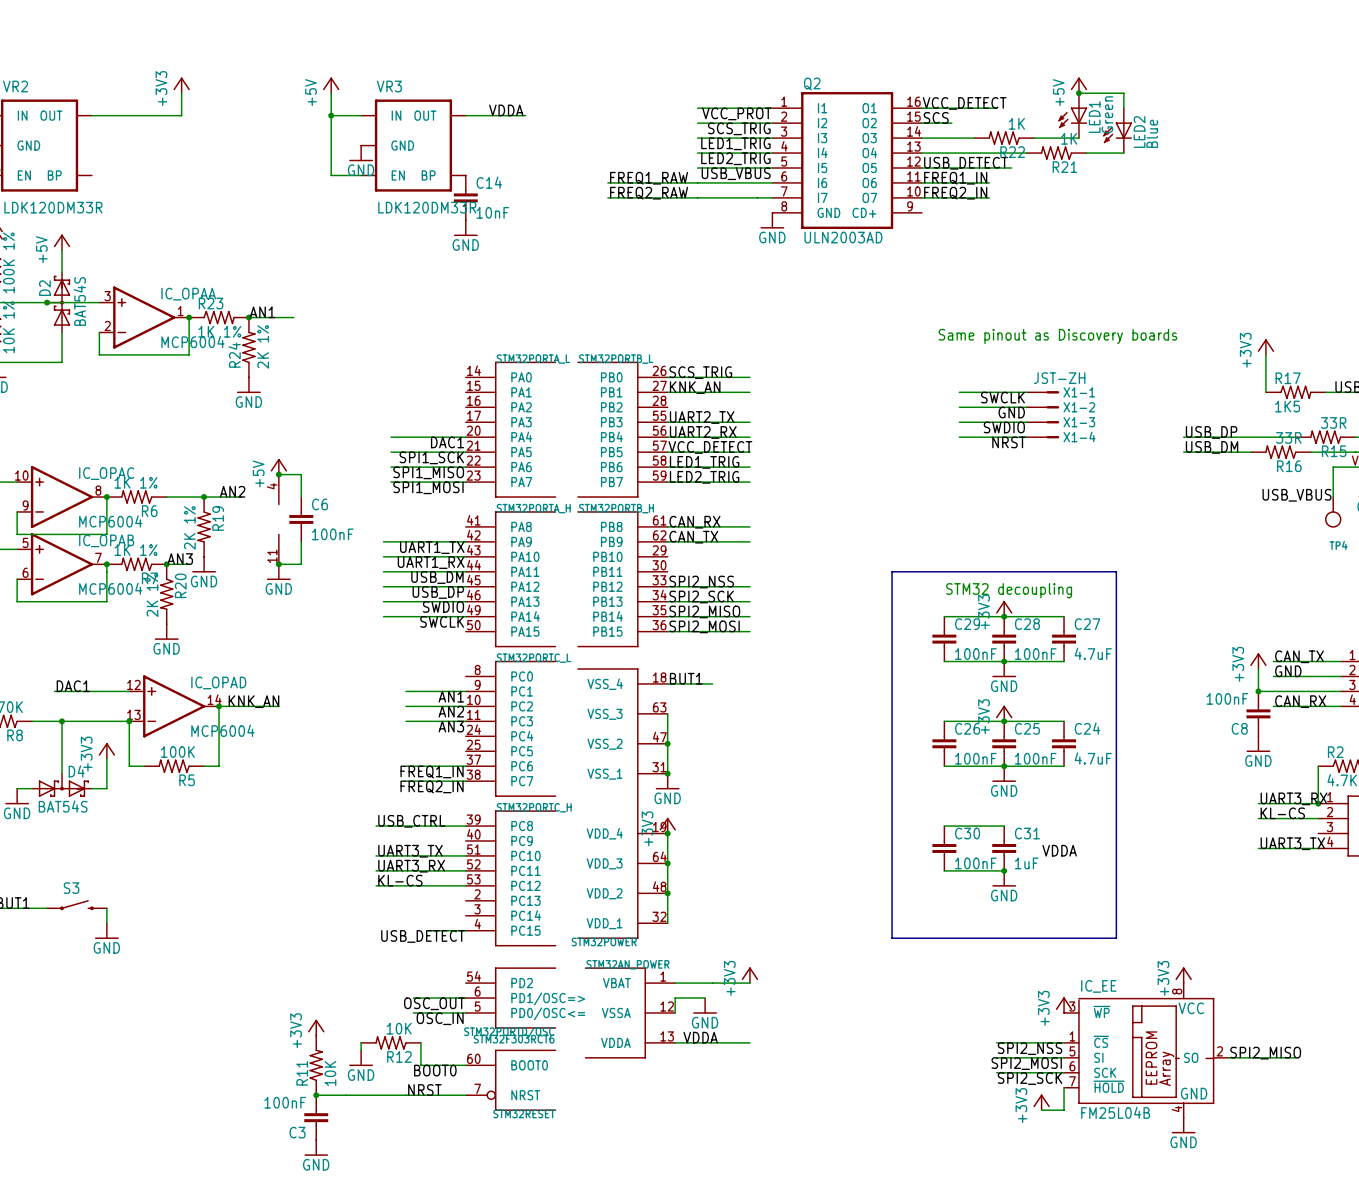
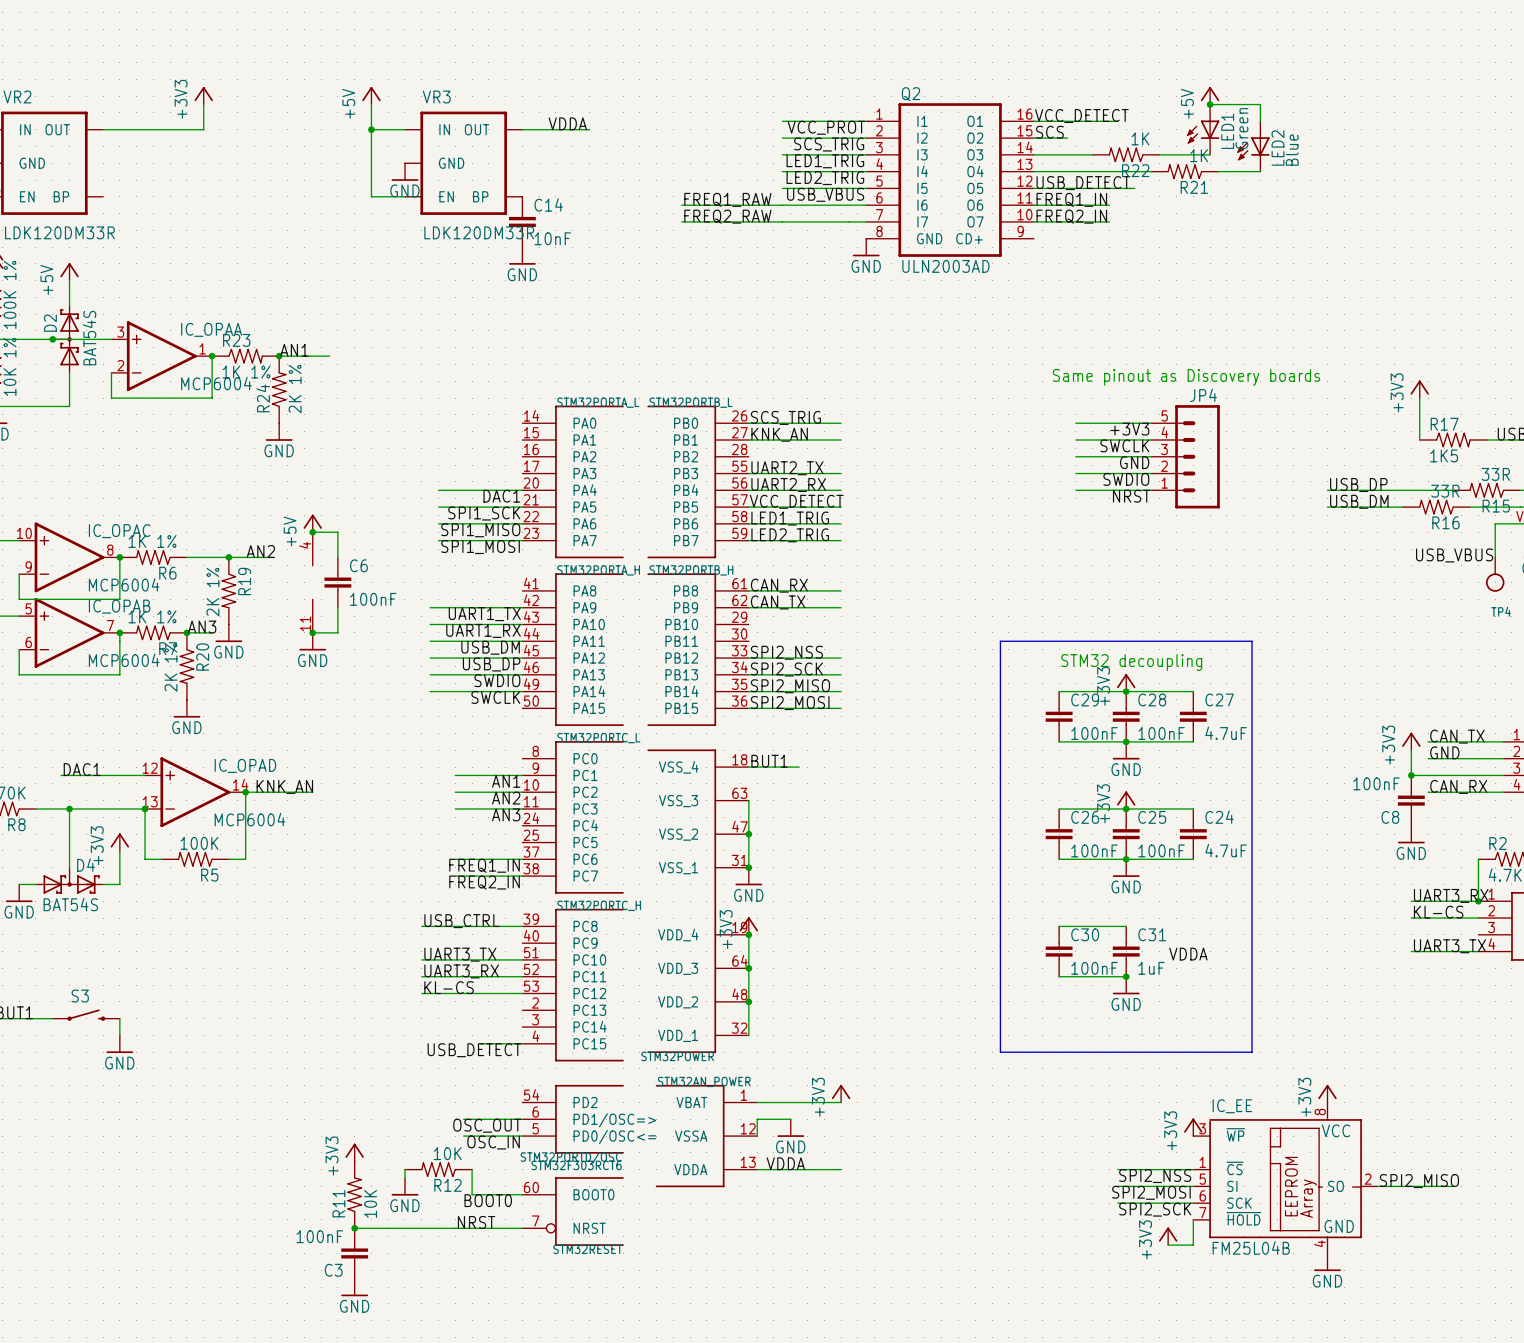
wire: none -> (1075, 423) (1151, 423)
label: none -> +3V3 (1129, 429)
X1-1: JST-ZH (1042, 392) -> none
X1-2: (1042, 407) -> none
JP4: none -> (1185, 456)
X1-3: (1042, 422) -> none
X1-4: (1042, 437) -> none

